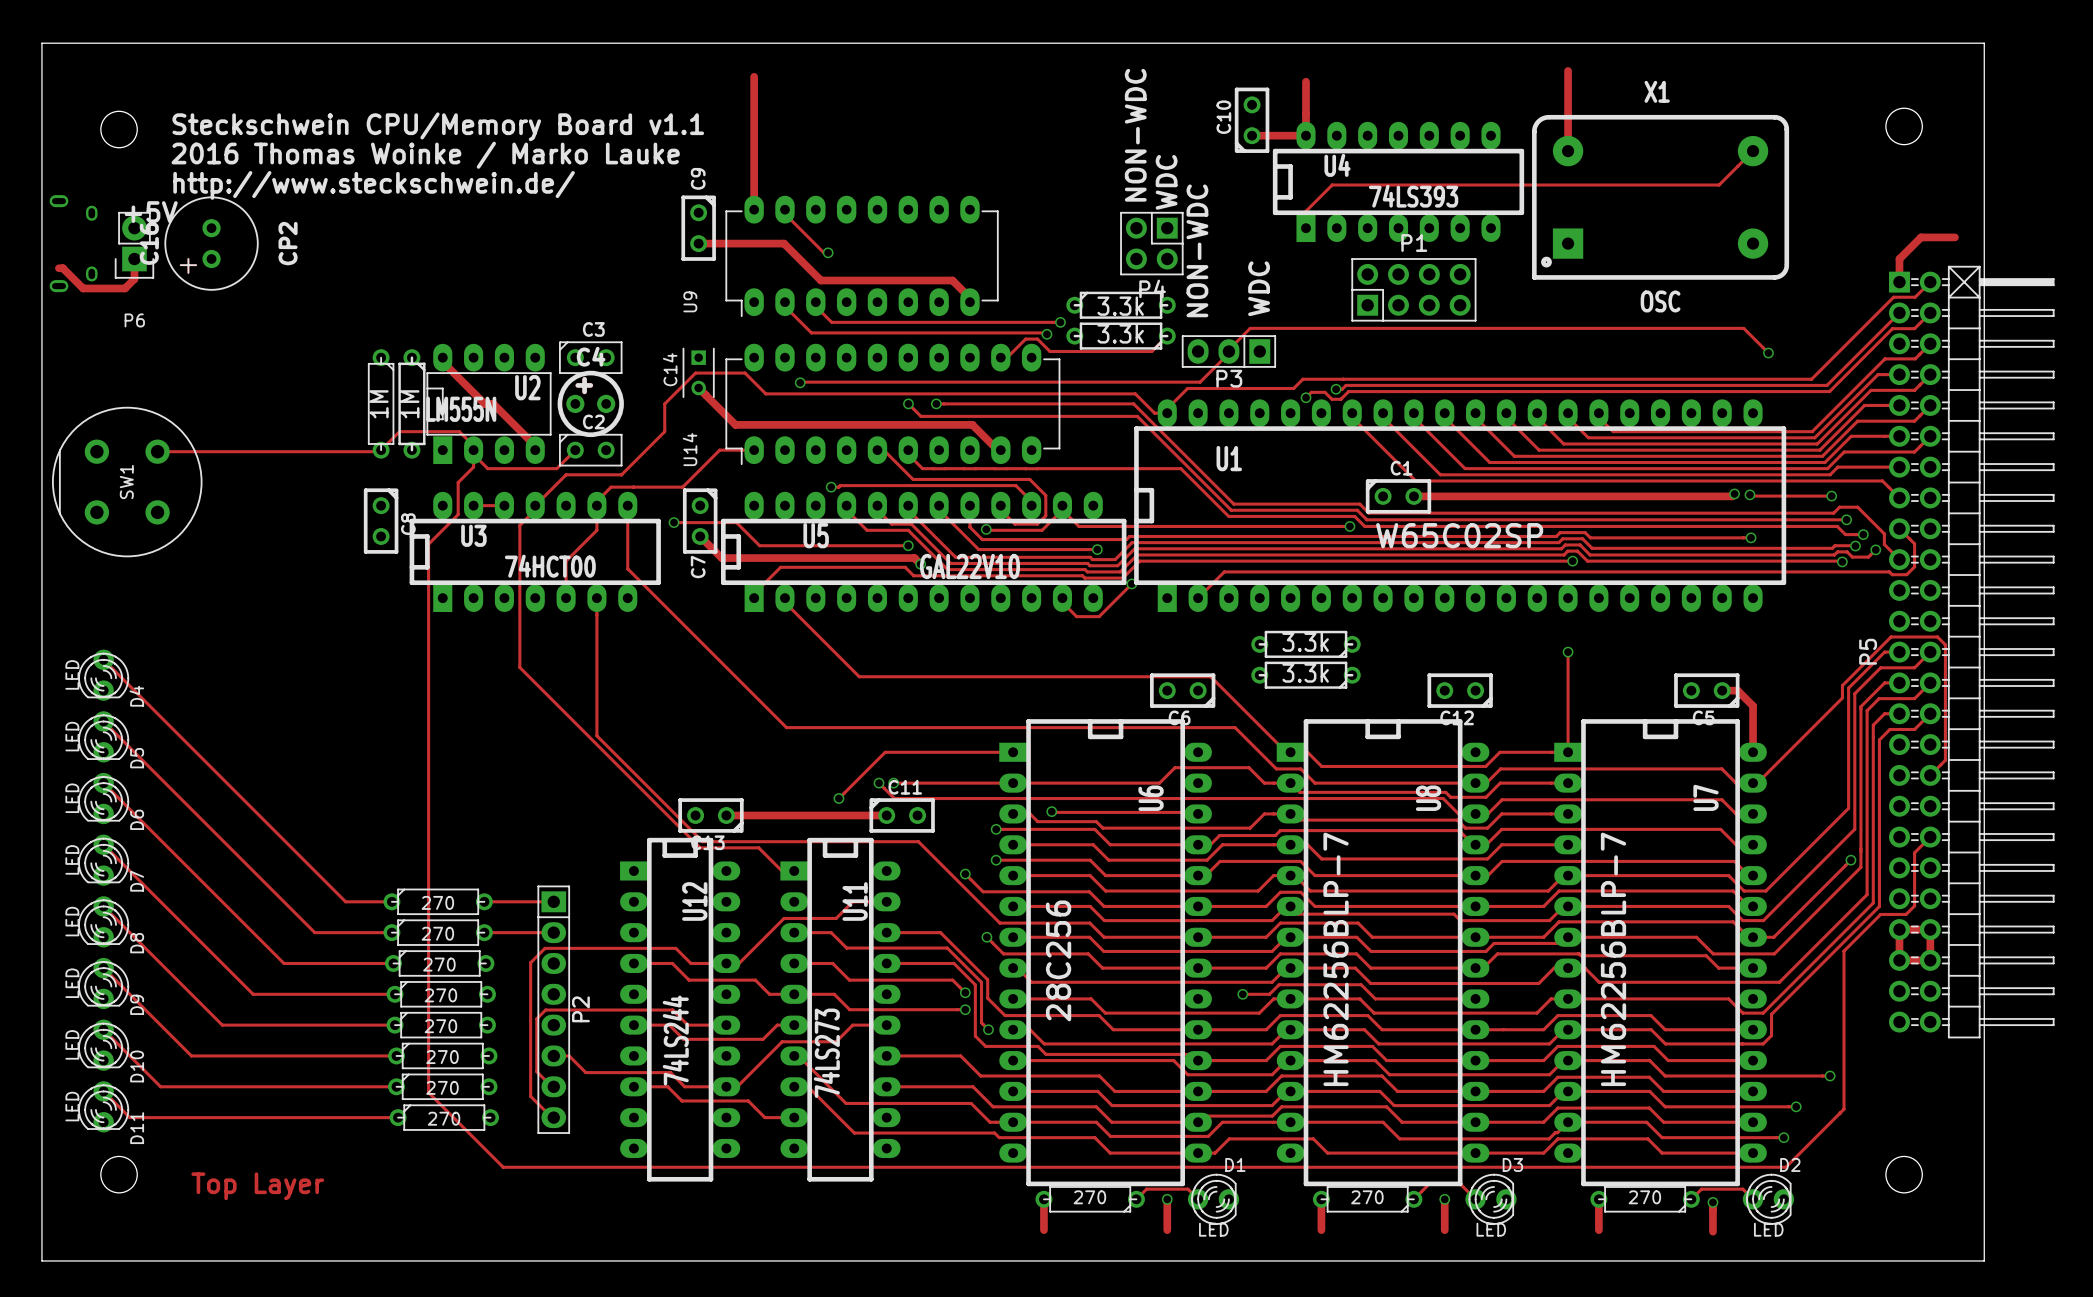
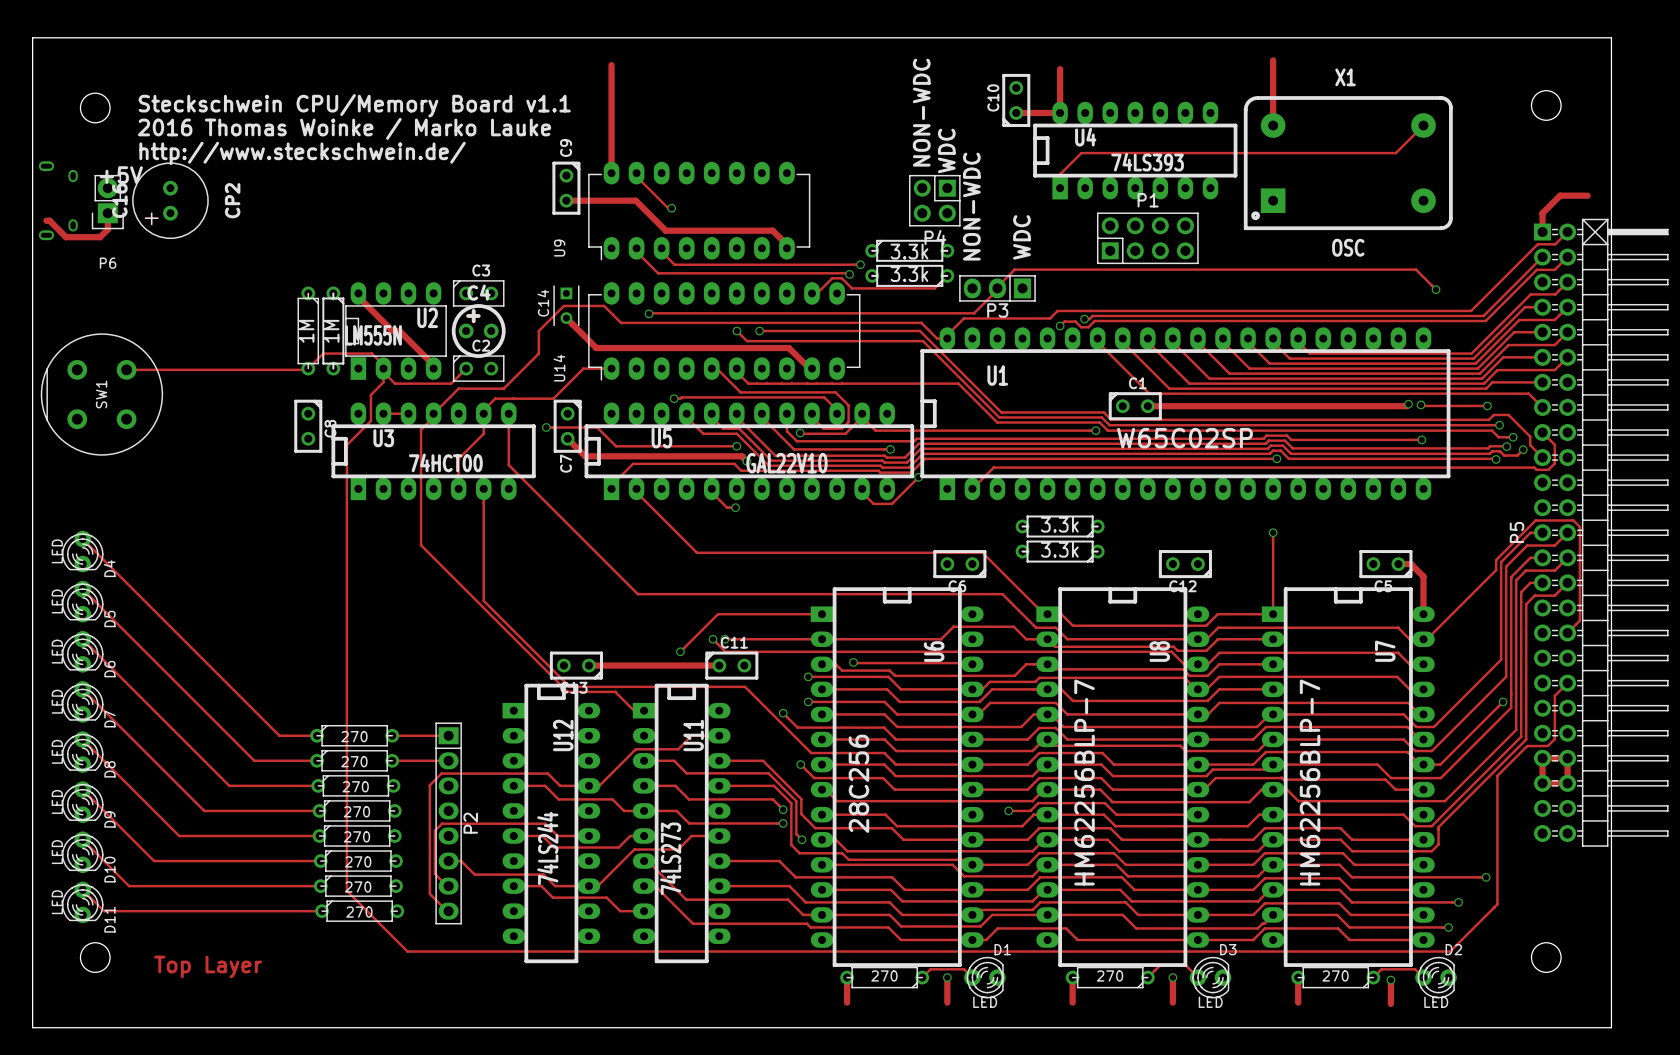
track: none -> (711, 492) (727, 507) (735, 507)
via: none -> (735, 507)

